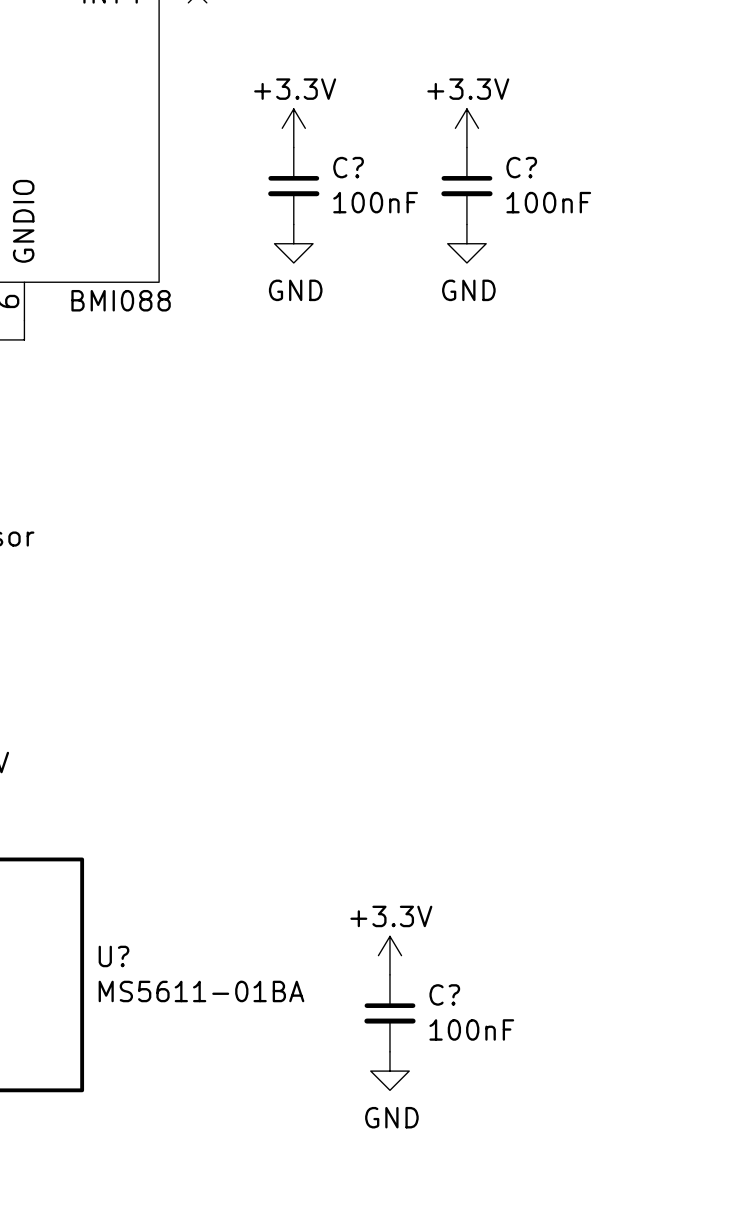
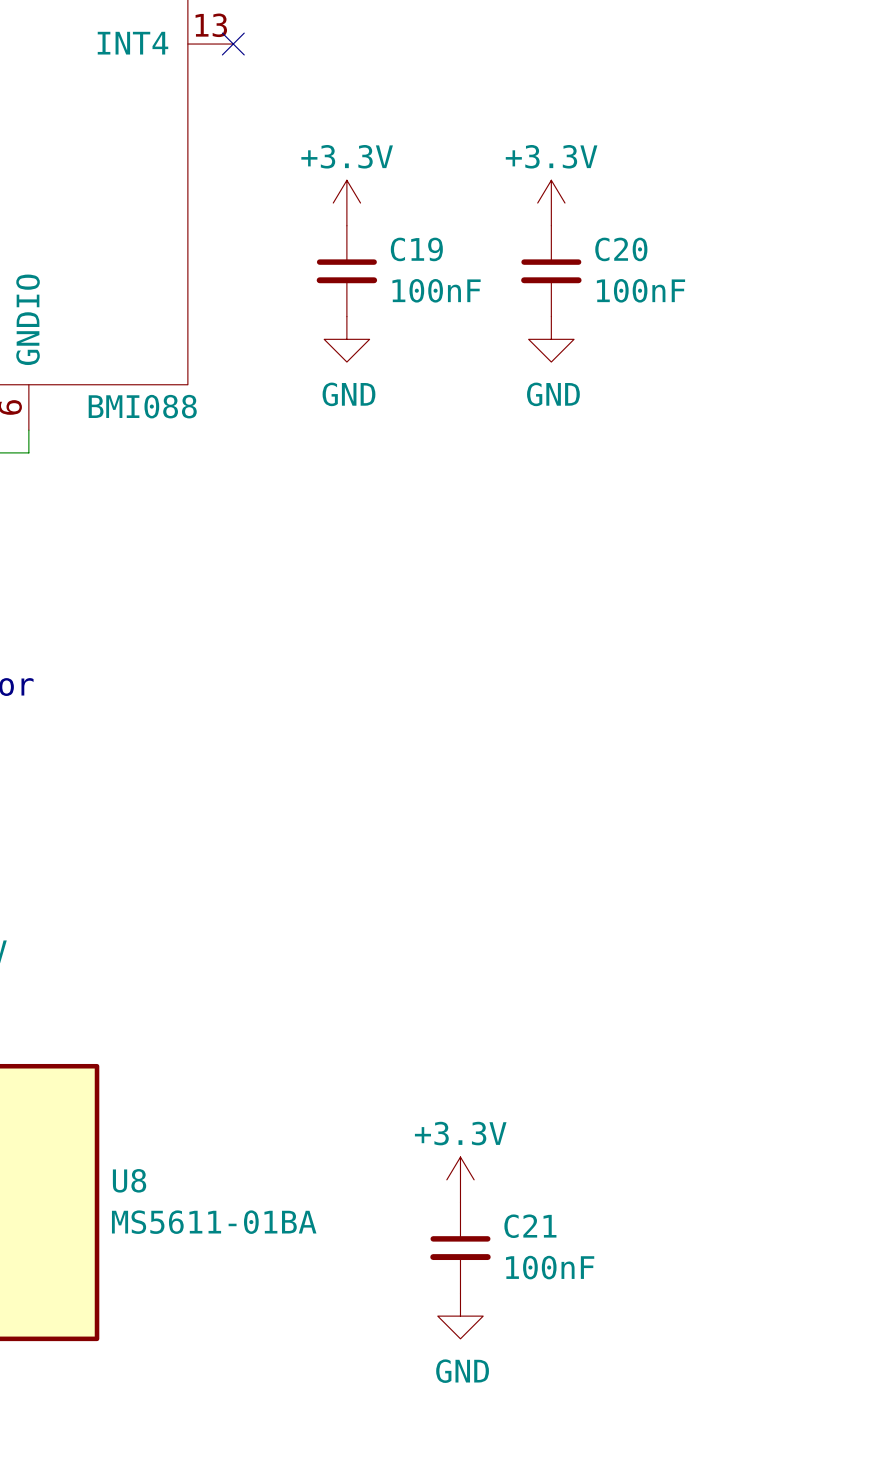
C? name: C? (348, 167) -> C19 (416, 249)
C? name: C? (521, 167) -> C20 (621, 249)
U? name: U? (113, 956) -> U8 (129, 1180)
C? name: C? (444, 994) -> C21 (530, 1226)

